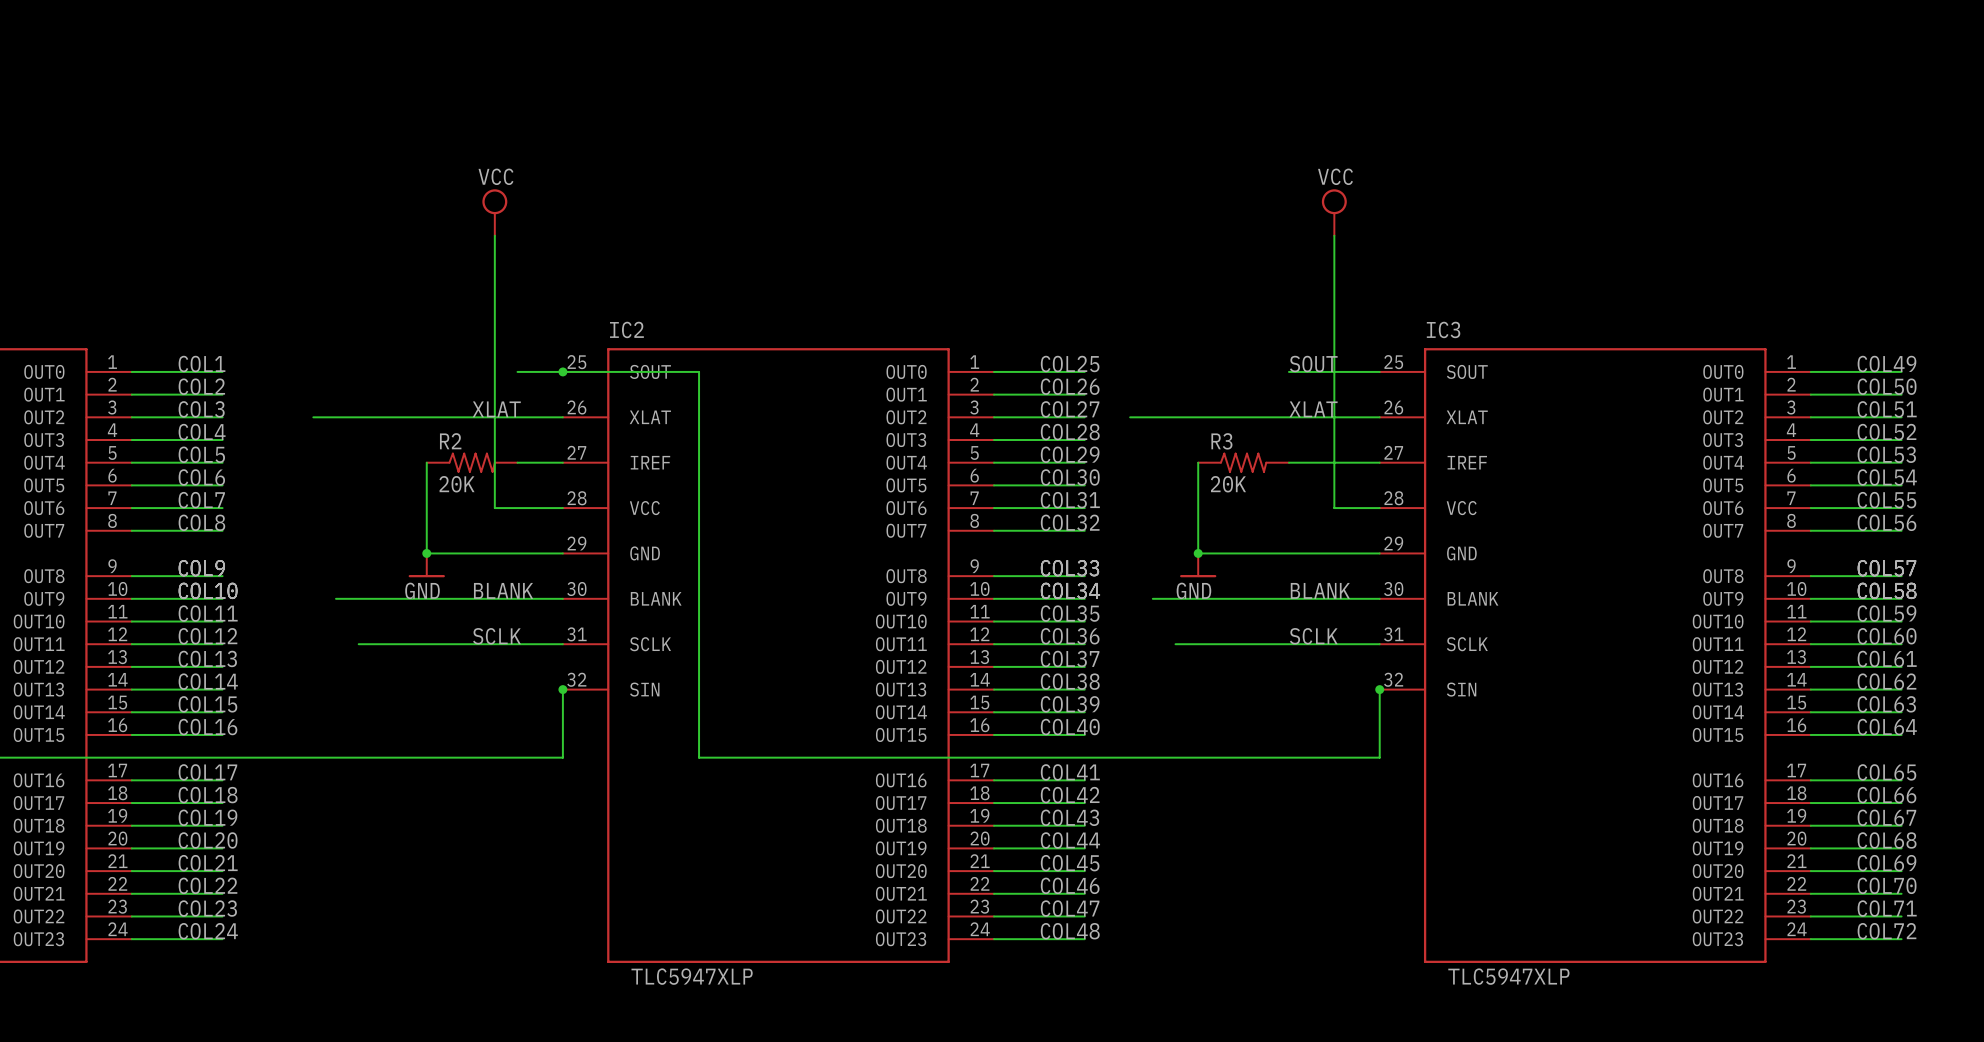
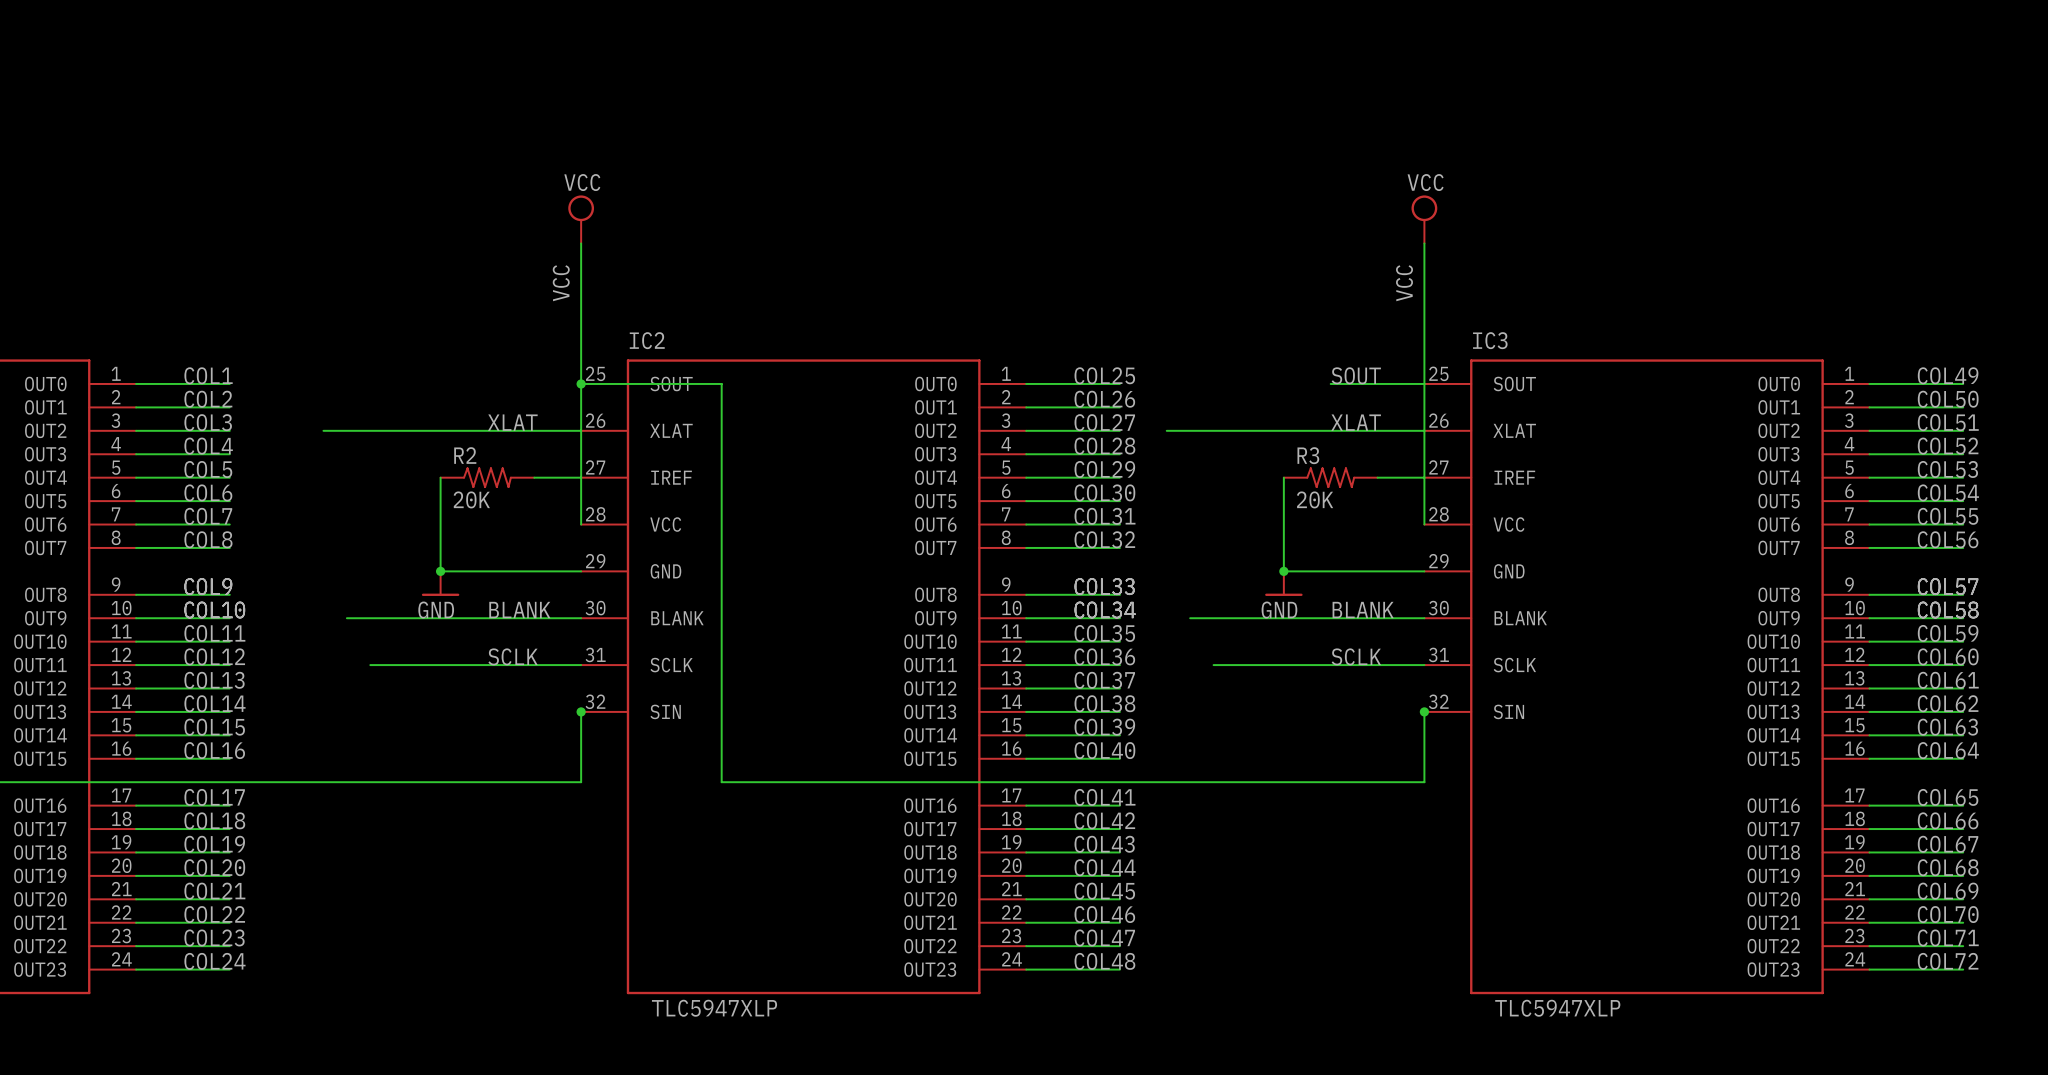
power symbol position: VCC (494, 212) -> VCC (581, 219)
power symbol position: VCC (1334, 212) -> VCC (1424, 219)
wire: (494, 235) (494, 508) (562, 508) -> (581, 243) (581, 524)
wire: (1334, 235) (1334, 508) (1379, 508) -> (1424, 243) (1424, 524)
label: none -> VCC (561, 283)
label: none -> VCC (1404, 283)
wire: (517, 371) (562, 371) -> none
wire: (1198, 462) (1198, 553) (1243, 553) -> (1283, 477) (1283, 571)
R3 position: (1243, 462) -> (1330, 477)
junction position: (1198, 553) -> (1283, 571)
power symbol position: GND (1198, 565) -> GND (1283, 583)

